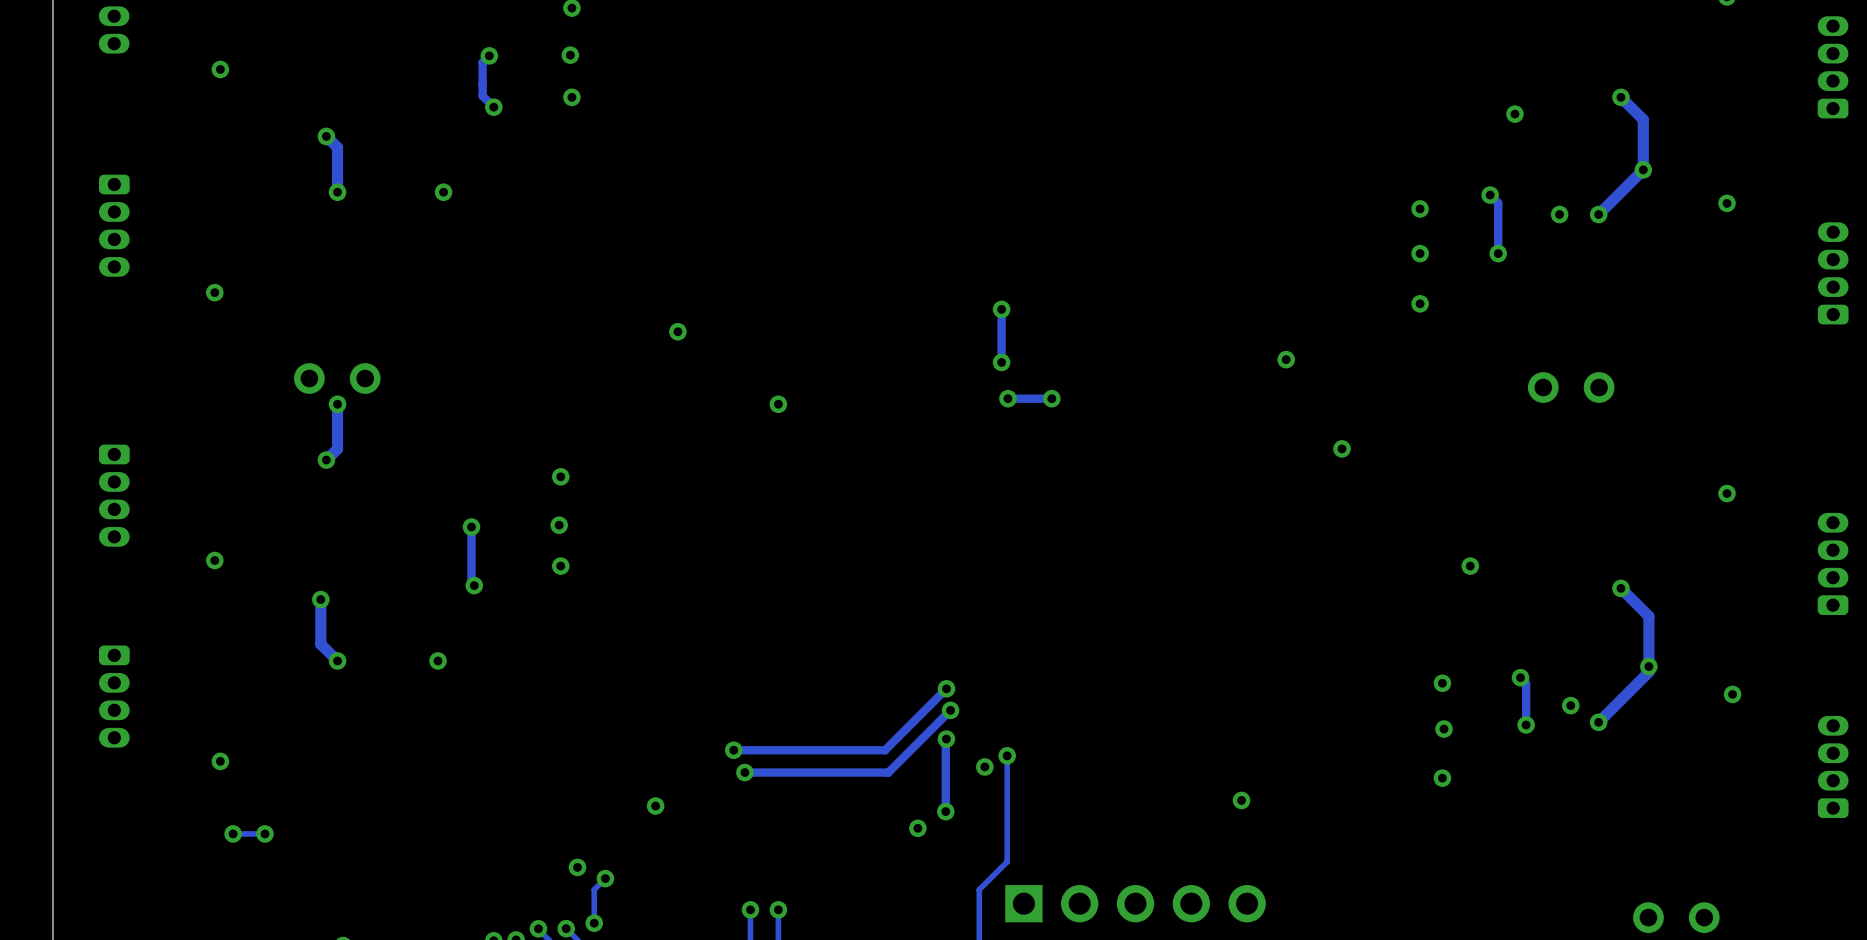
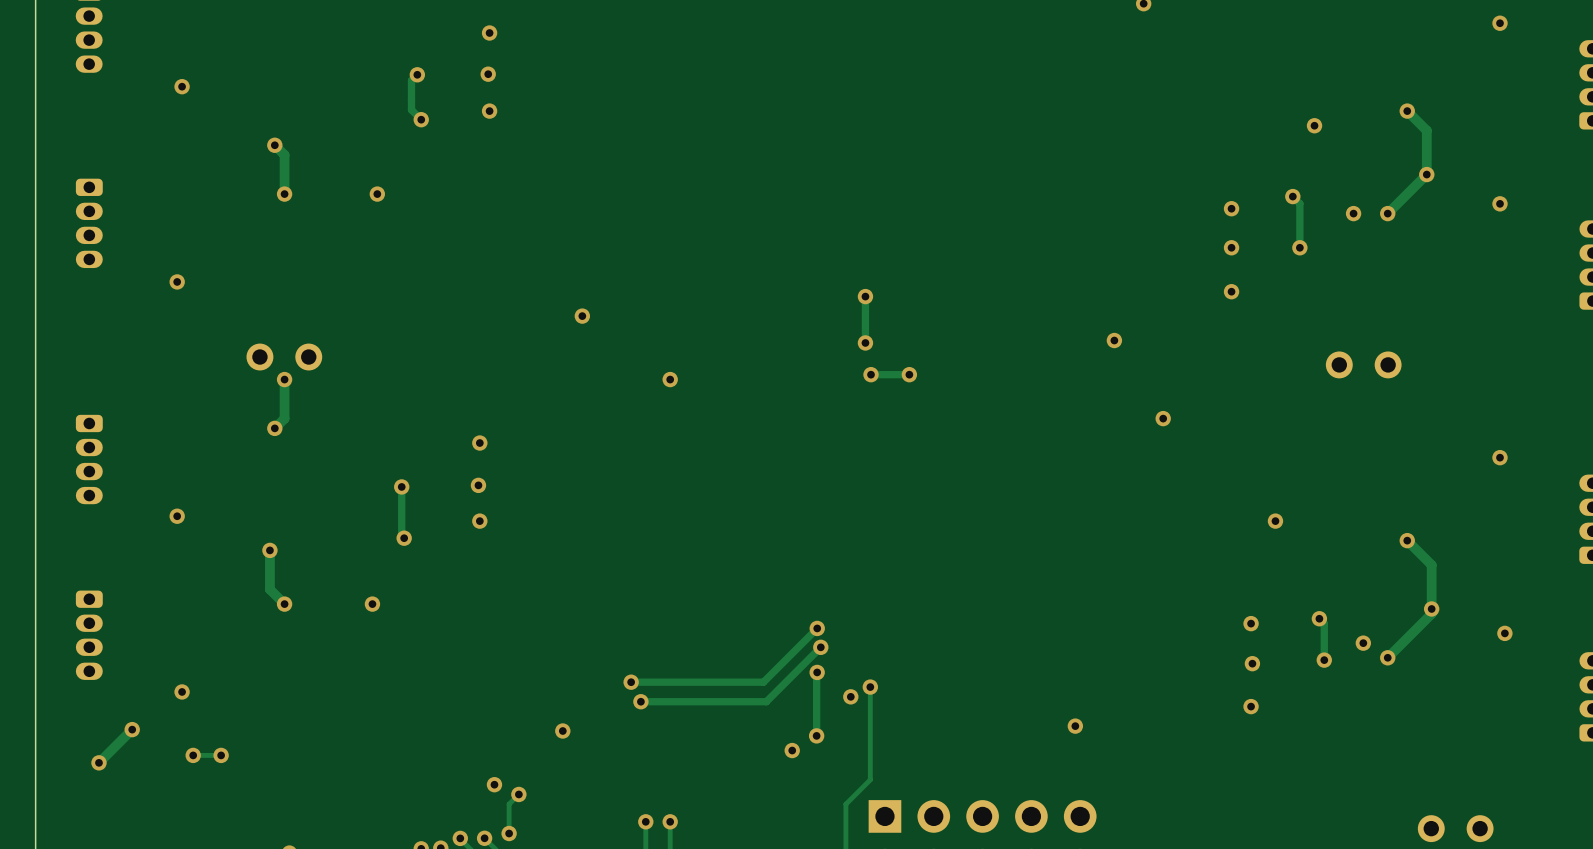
track: none -> (132, 729) (98, 762)
via: none -> (132, 729)
via: none -> (98, 762)

